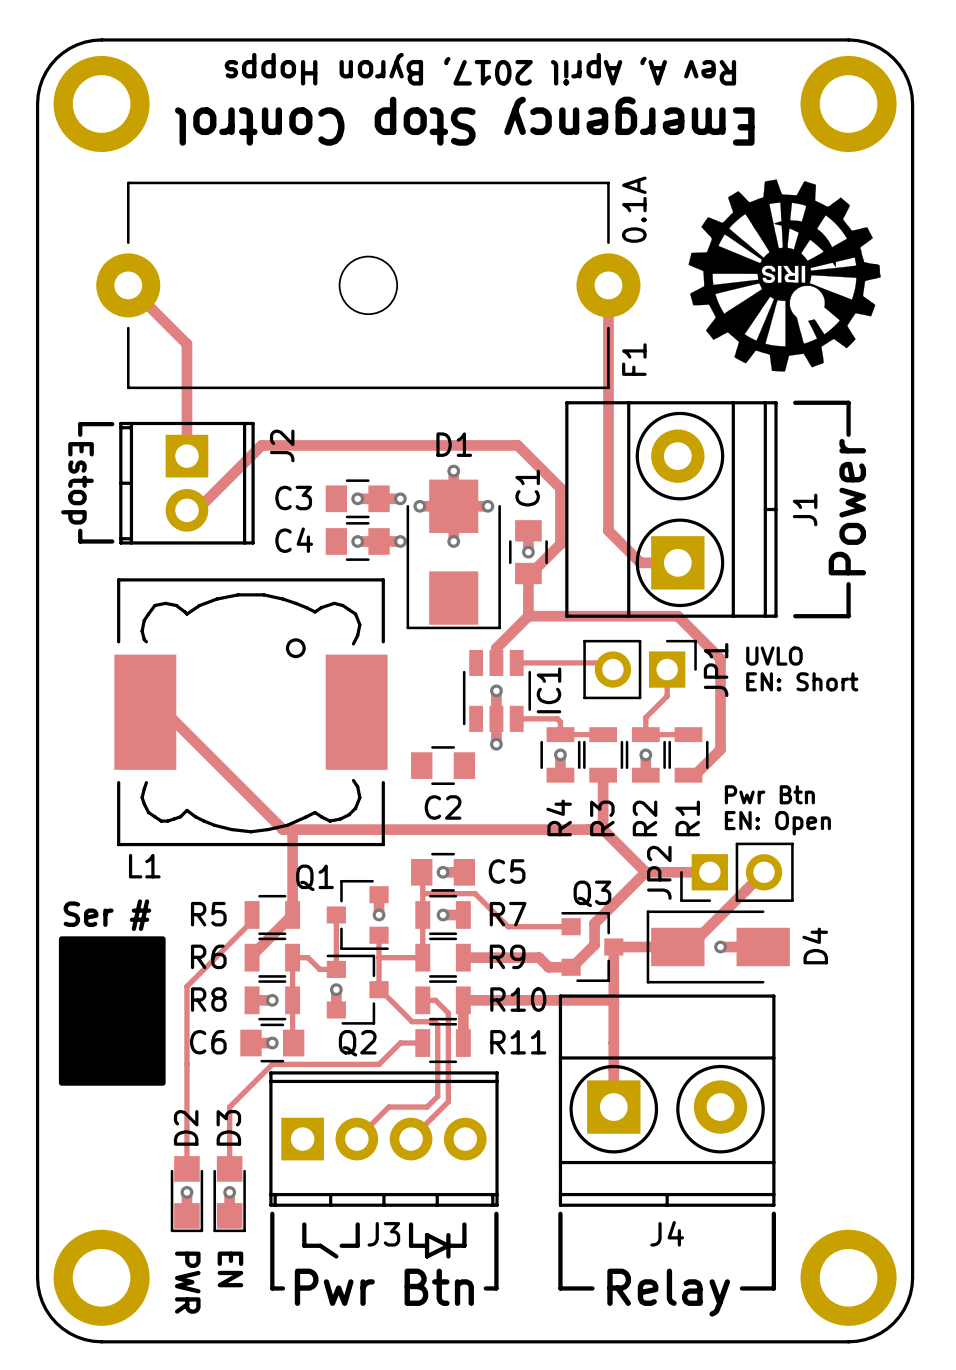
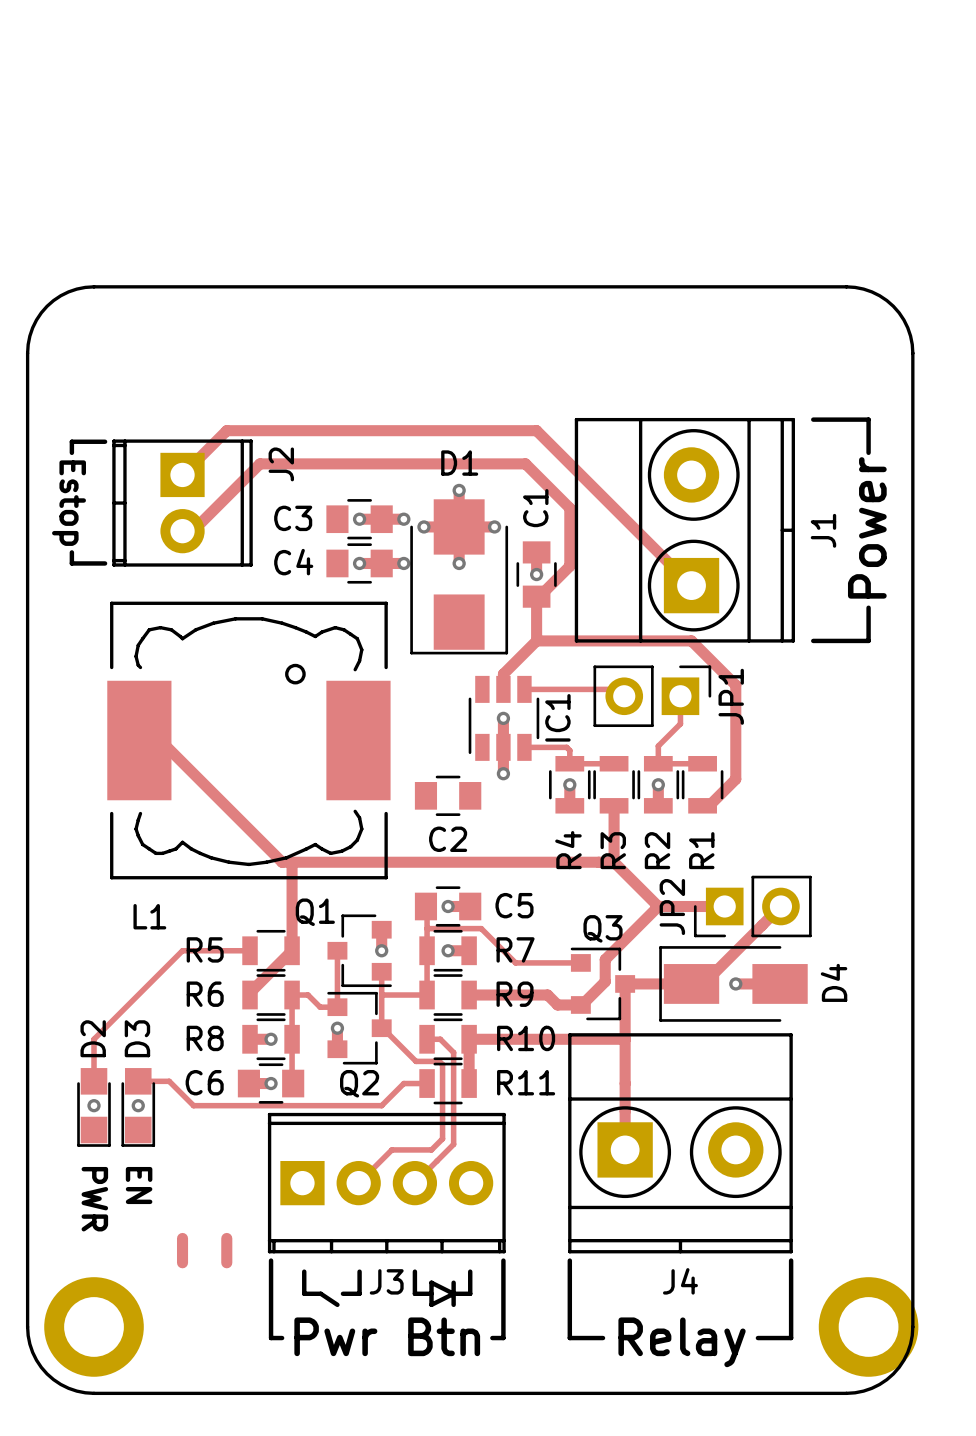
text: Rev A, April 2017, Byron Hopps (480, 69) -> none
part: (101, 103) -> none
part: (848, 103) -> none
text: Emergency Stop Control (464, 121) -> none
drawing: [688, 179, 881, 372] -> none
text: 0.1A (634, 209) -> none
top track: (128, 285) (186, 344) (186, 456) -> none
F1: (368, 285) -> none
top track: (608, 285) (608, 530) (640, 562) (677, 562) -> (182, 474) (226, 430) (536, 430) (691, 585)
board edge: (37, 338) (38, 95) (42, 79) (50, 65) (62, 53) (85, 42) (101, 39) (848, 39) (865, 42) (880, 48) (899, 65) (910, 87) (912, 103) (912, 1277) (910, 1294) (904, 1309) (887, 1328) (865, 1339) (827, 1341) -> (27, 353) (32, 327) (47, 306) (68, 291) (94, 286) (846, 286) (863, 289) (879, 295) (899, 312) (907, 327) (912, 353) (912, 1326) (907, 1352) (893, 1373) (871, 1388) (846, 1393)
text: UVLO (774, 656) -> none
text: EN: Short (802, 681) -> none
text: Pwr Btn (769, 794) -> none
text: EN: Open (777, 823) -> none
L1 name position: L1 (144, 866) -> L1 (149, 916)
top track: (252, 914) (252, 921) (186, 986) (186, 1168) -> (250, 950) (182, 950) (94, 1039) (94, 1081)
text: Ser # (107, 915) -> none
drawing: [58, 936, 166, 1086] -> none
via: none -> (94, 1105)
via: none -> (138, 1105)
top track: (272, 1064) (229, 1107) (229, 1168) -> (271, 1105) (193, 1105) (169, 1081) (138, 1081)
via: (186, 1192) -> none
via: (229, 1192) -> none
D2 position: (186, 1194) -> (94, 1107)
D3 position: (229, 1194) -> (138, 1107)
text position: EN (230, 1269) -> EN (139, 1185)
text position: PWR (187, 1282) -> PWR (94, 1199)

